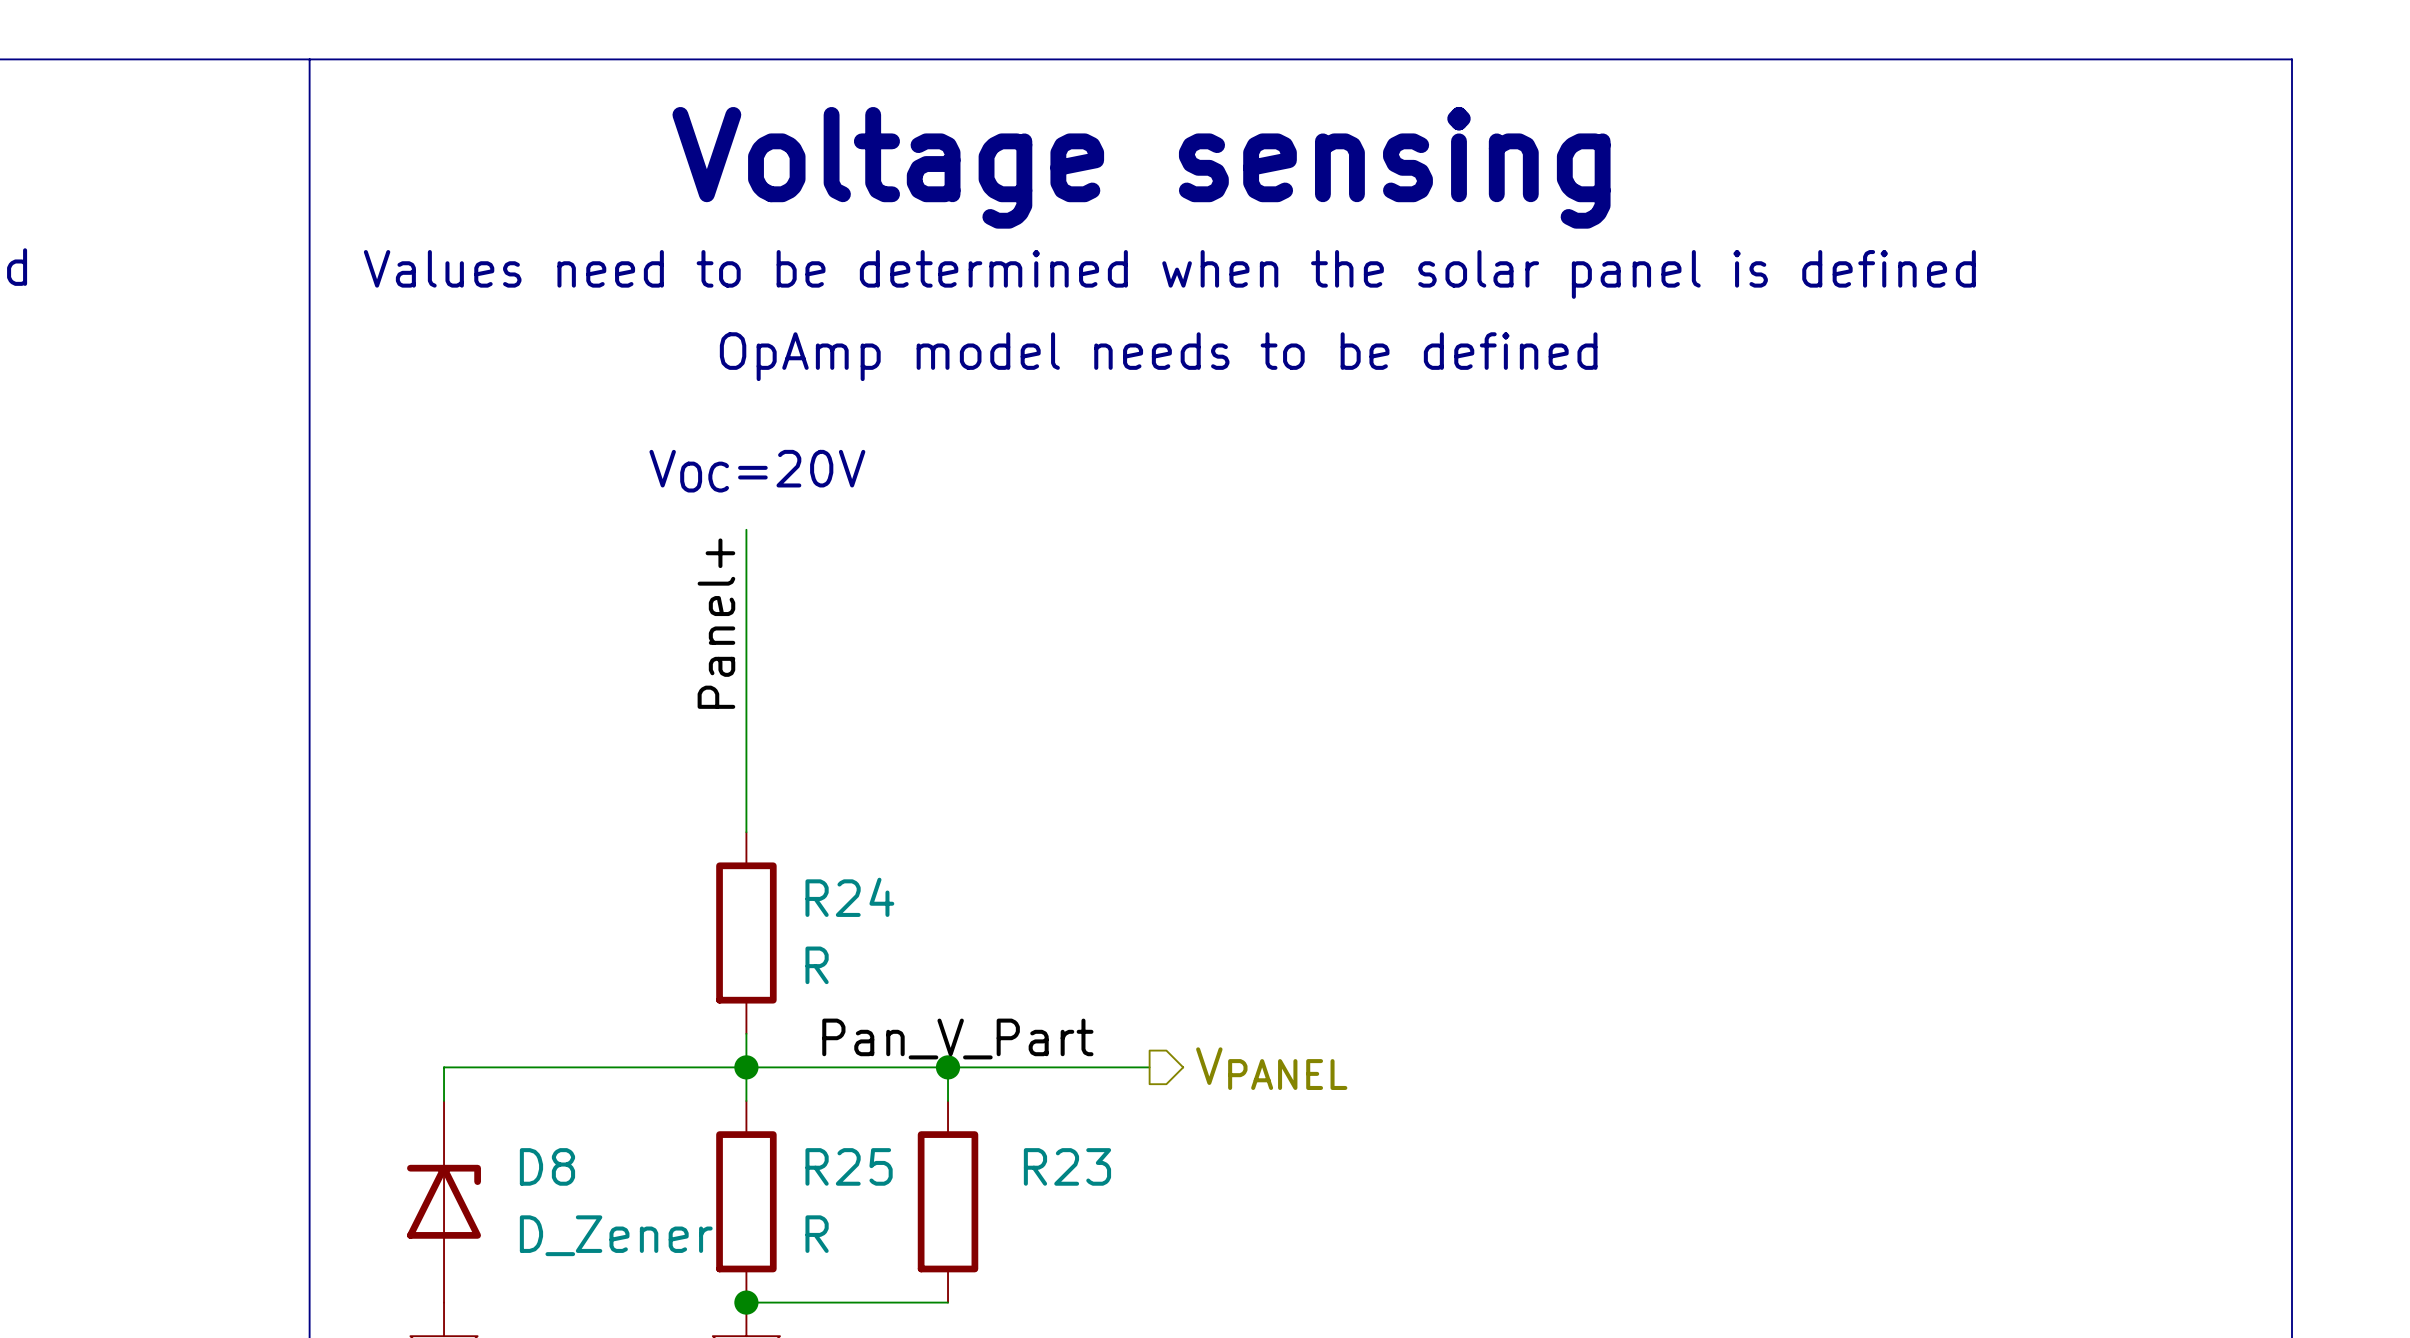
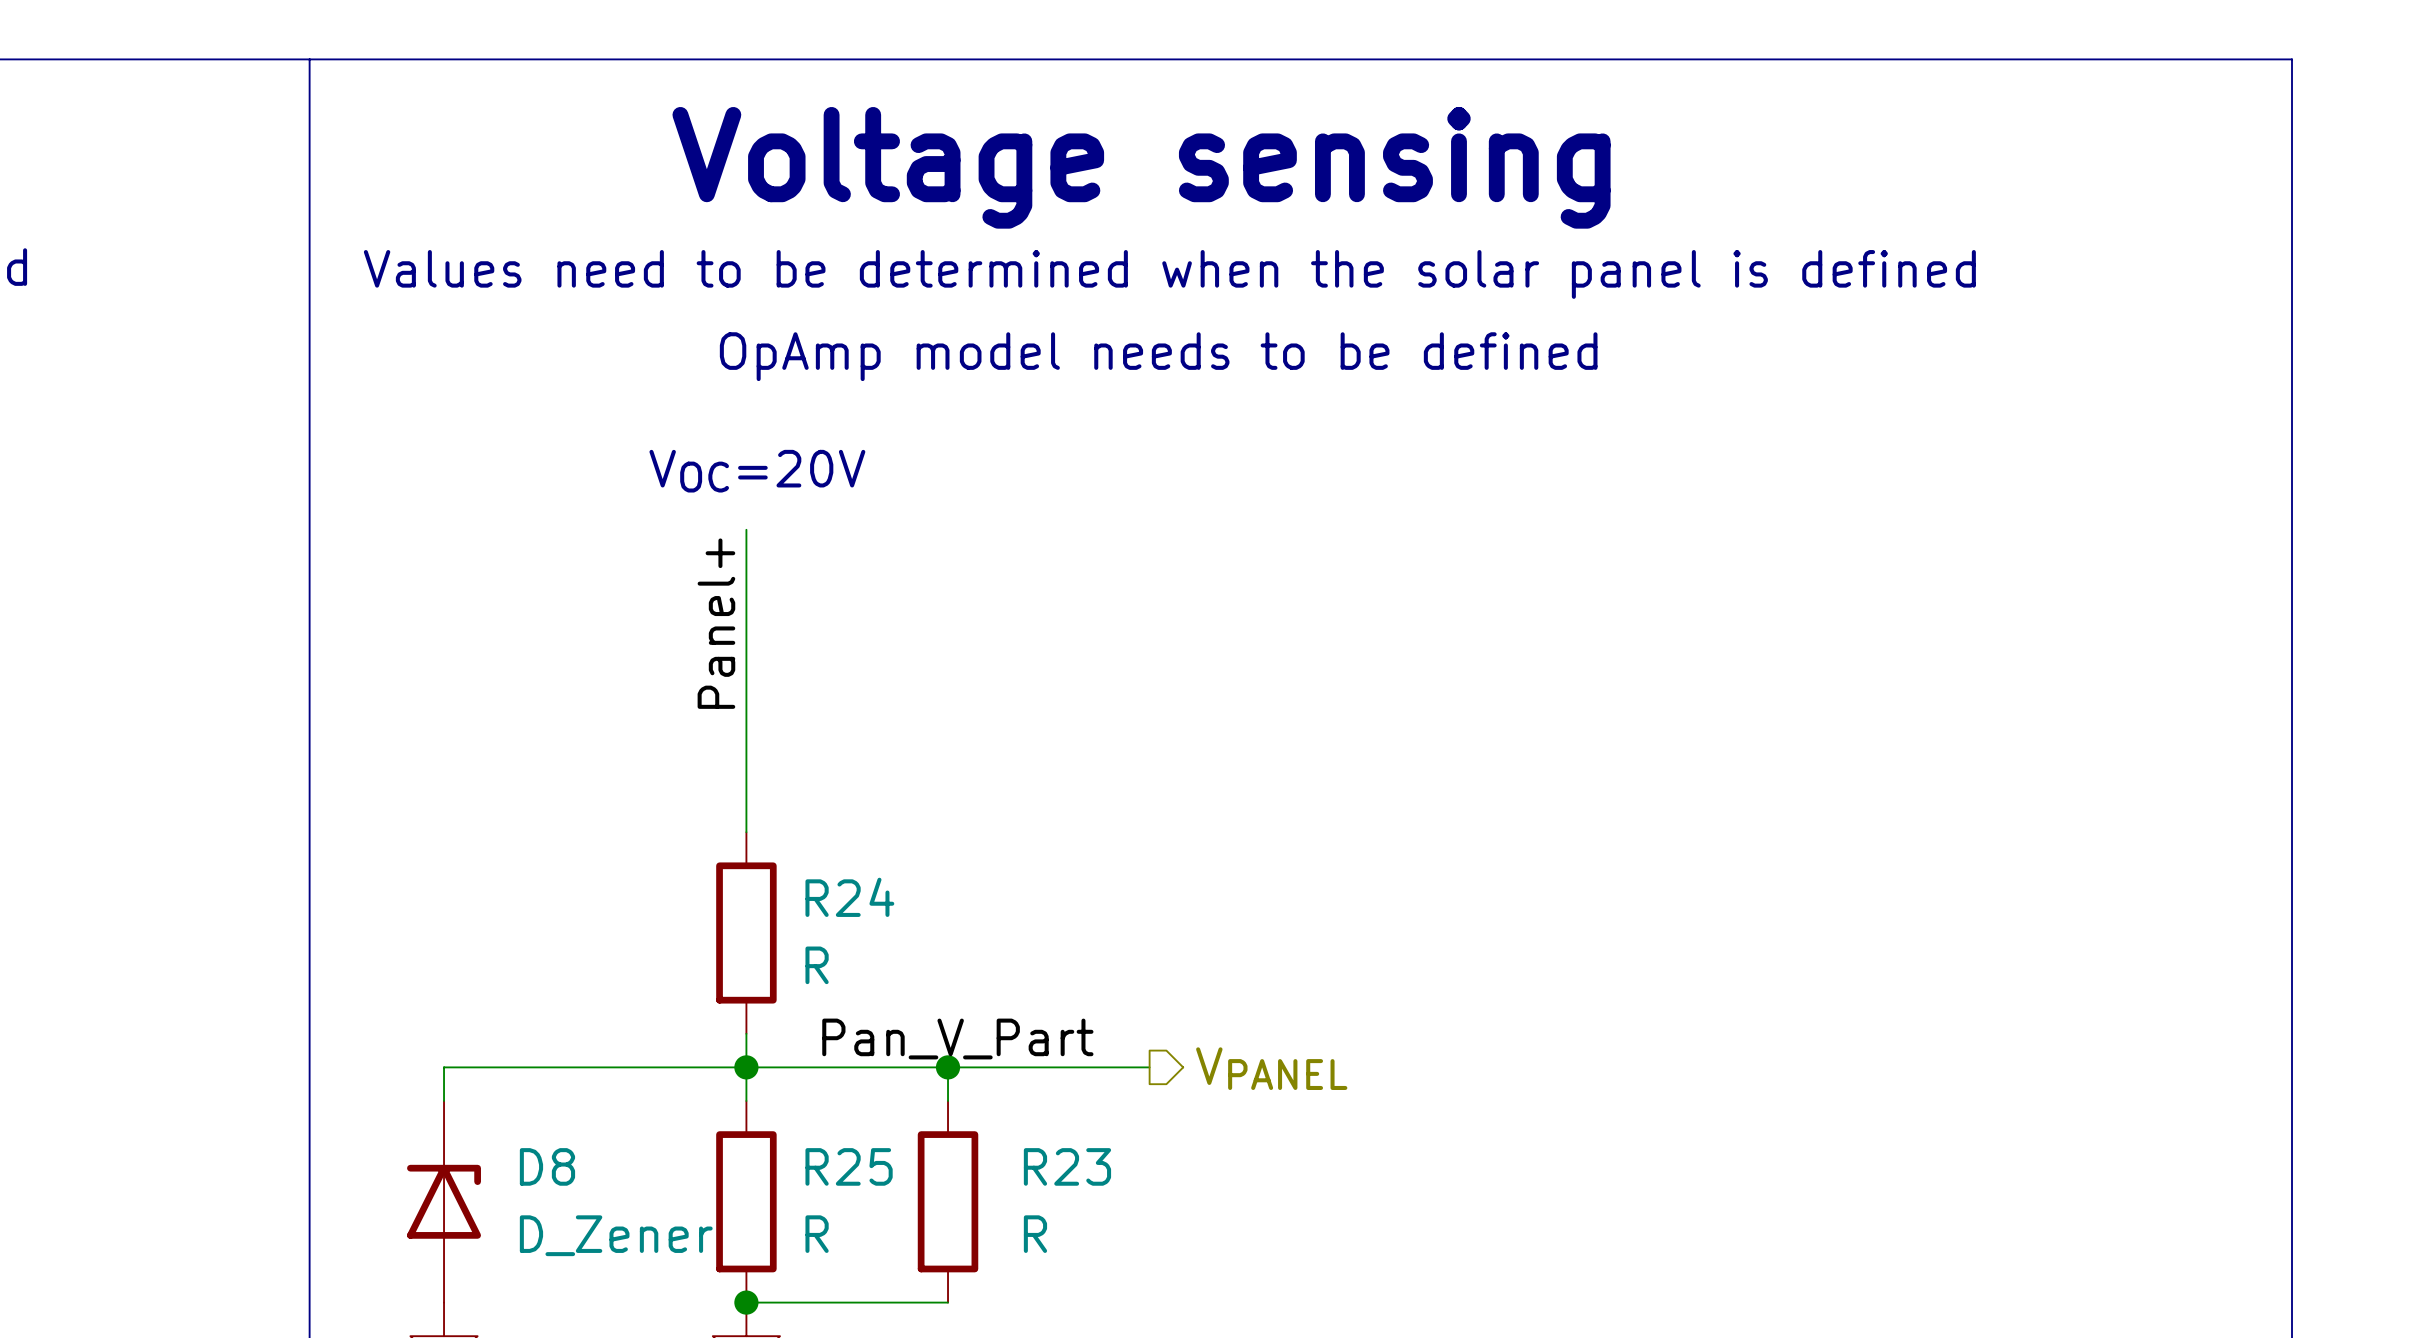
R23 value: none -> R (1035, 1234)

